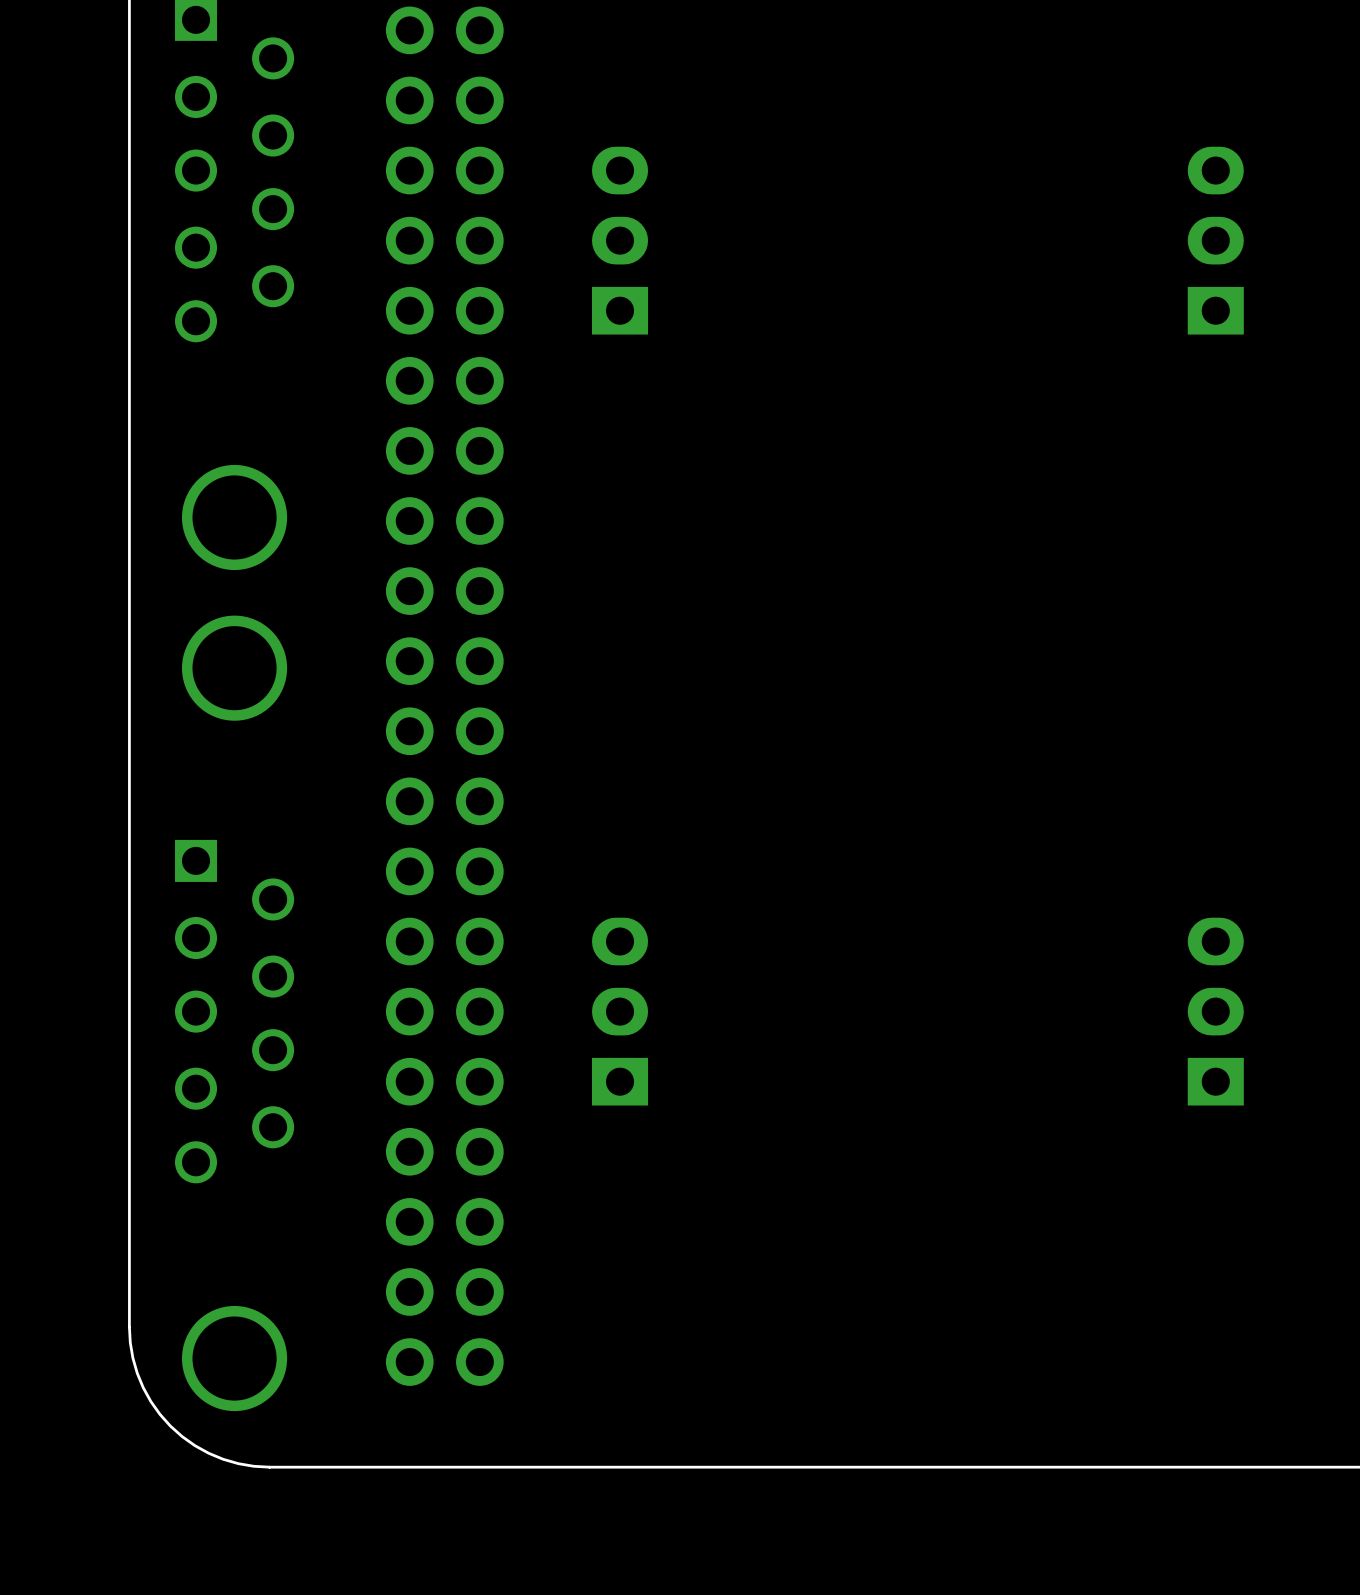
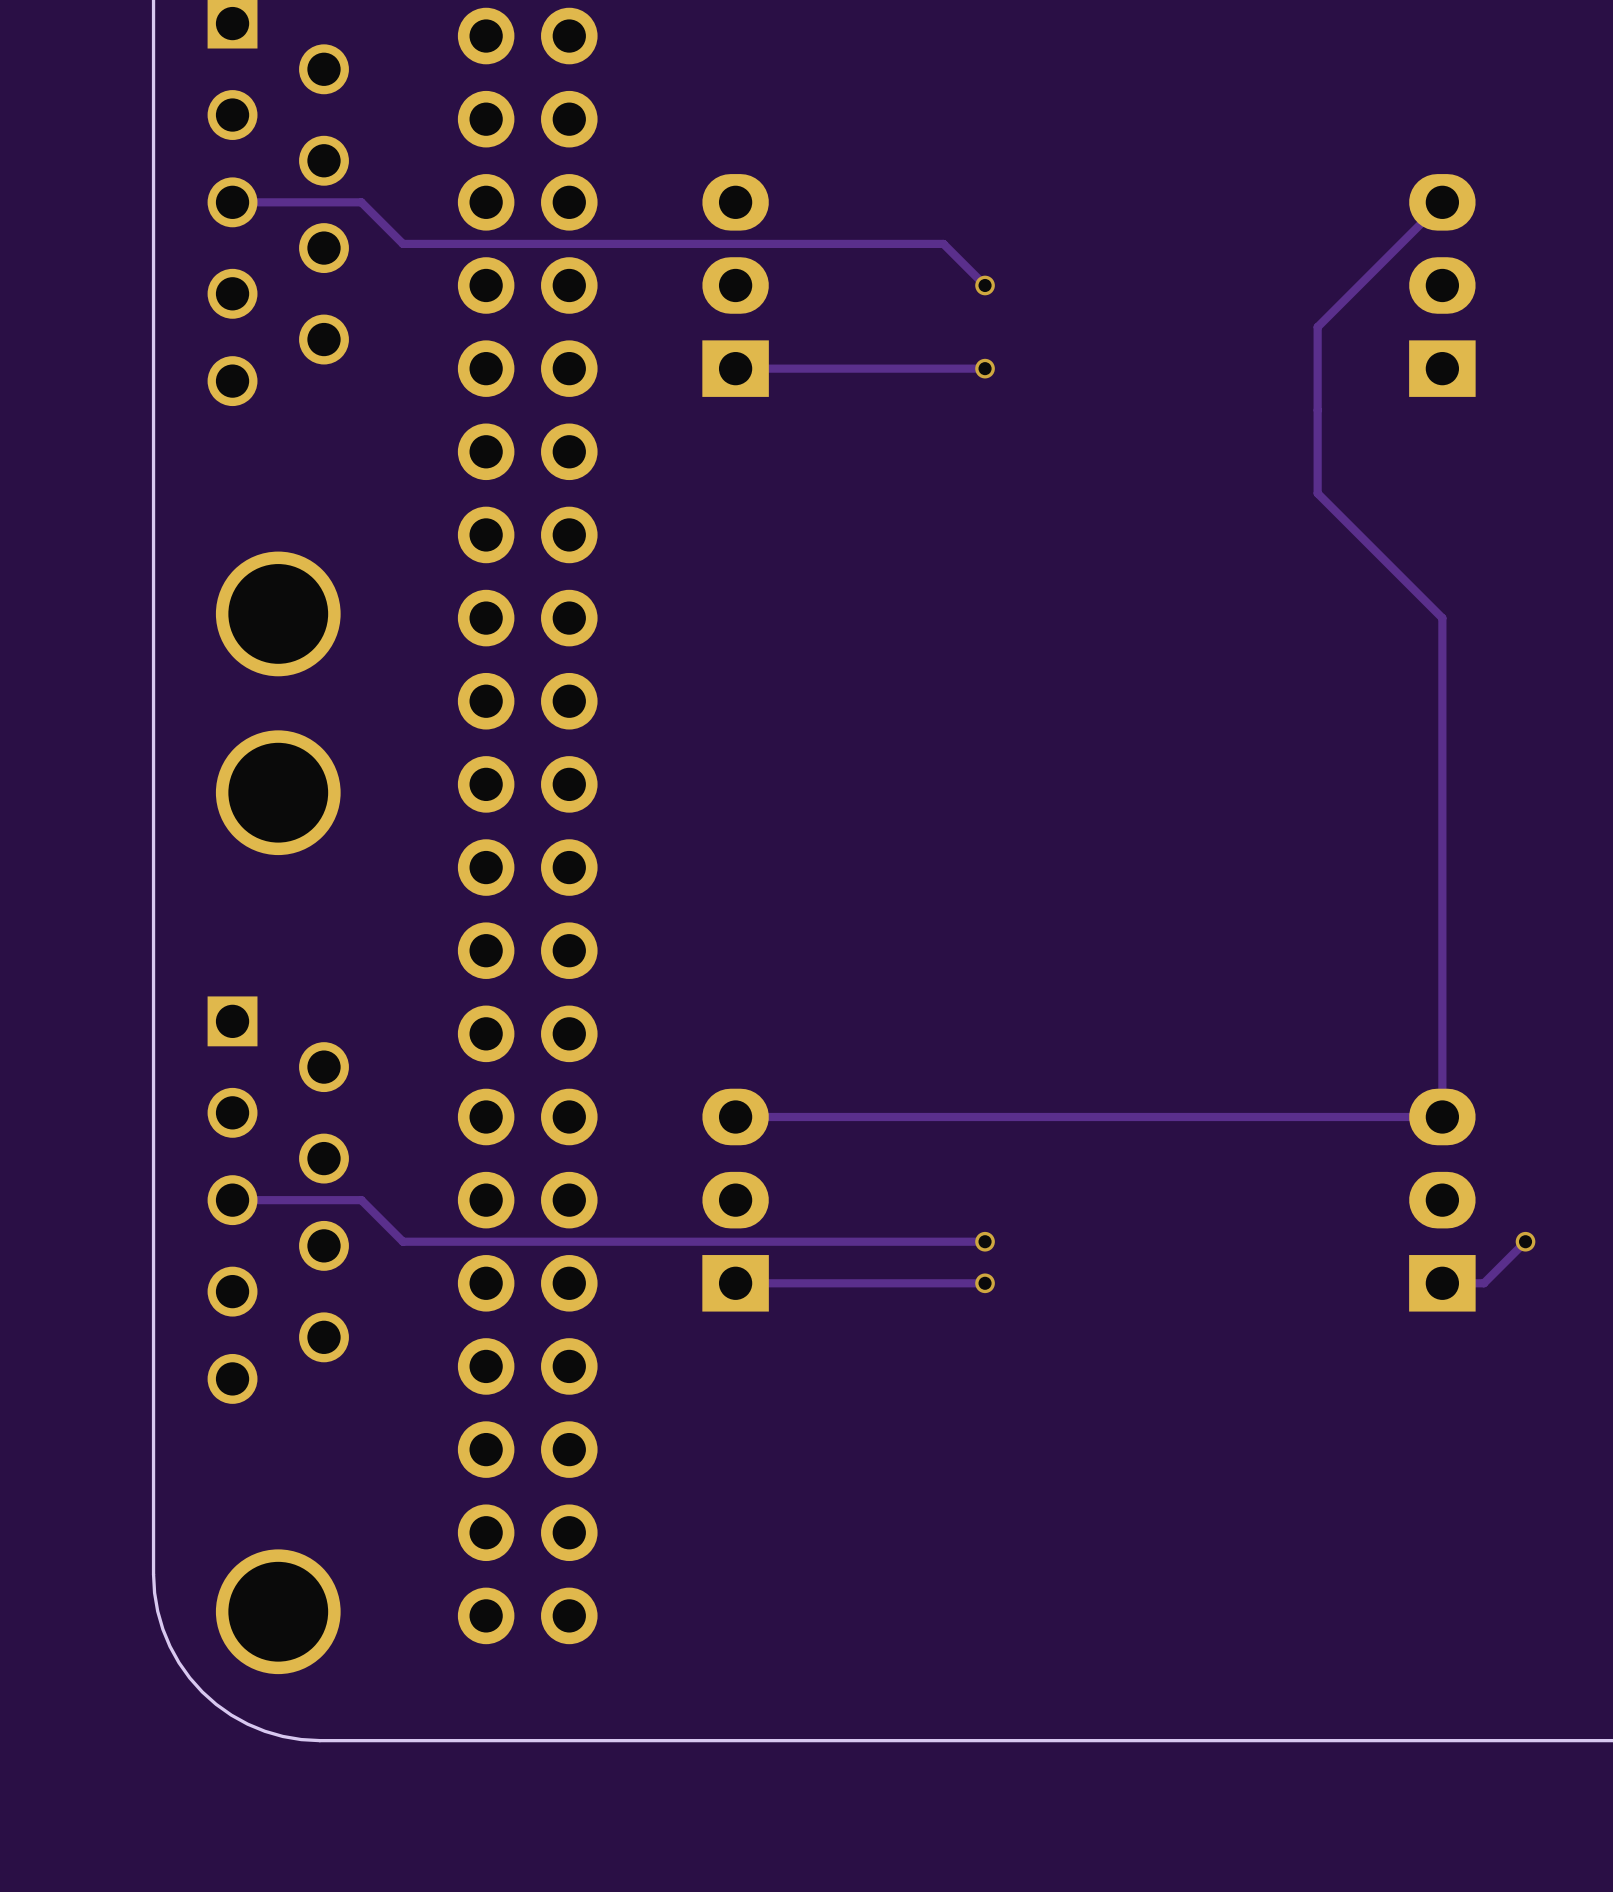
track: none -> (232, 202) (361, 202) (402, 243) (943, 243) (985, 285)
track: none -> (1442, 202) (1317, 327) (1317, 493) (1442, 618) (1442, 1116) (735, 1116)
via: none -> (985, 285)
track: none -> (985, 368) (735, 368)
via: none -> (985, 368)
track: none -> (232, 1200) (361, 1200) (402, 1241) (985, 1241)
via: none -> (985, 1241)
track: none -> (1525, 1241) (1483, 1283) (1442, 1283)
via: none -> (1525, 1241)
track: none -> (985, 1283) (735, 1283)
via: none -> (985, 1283)

